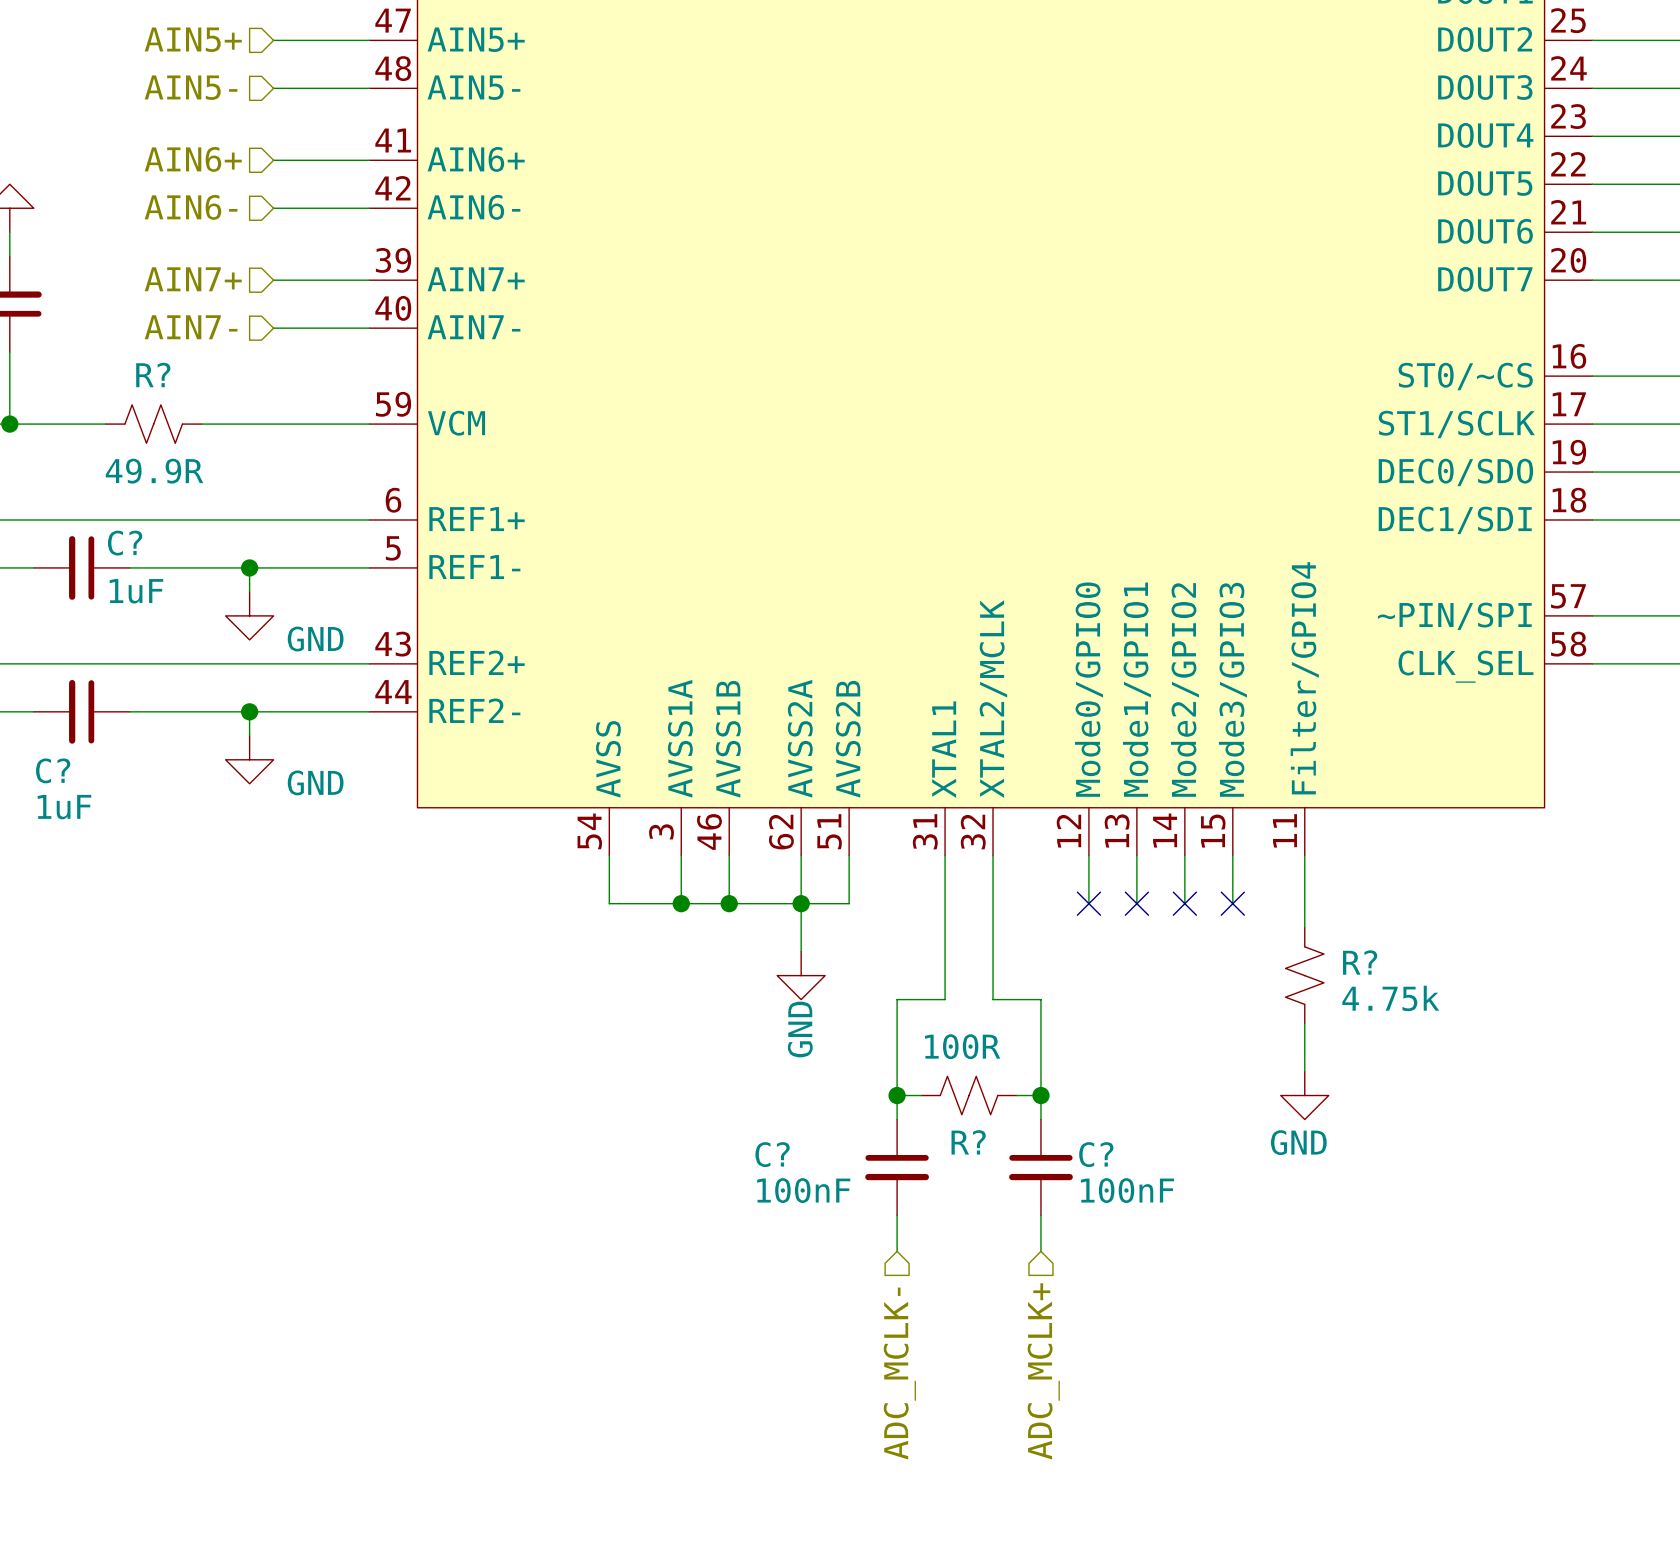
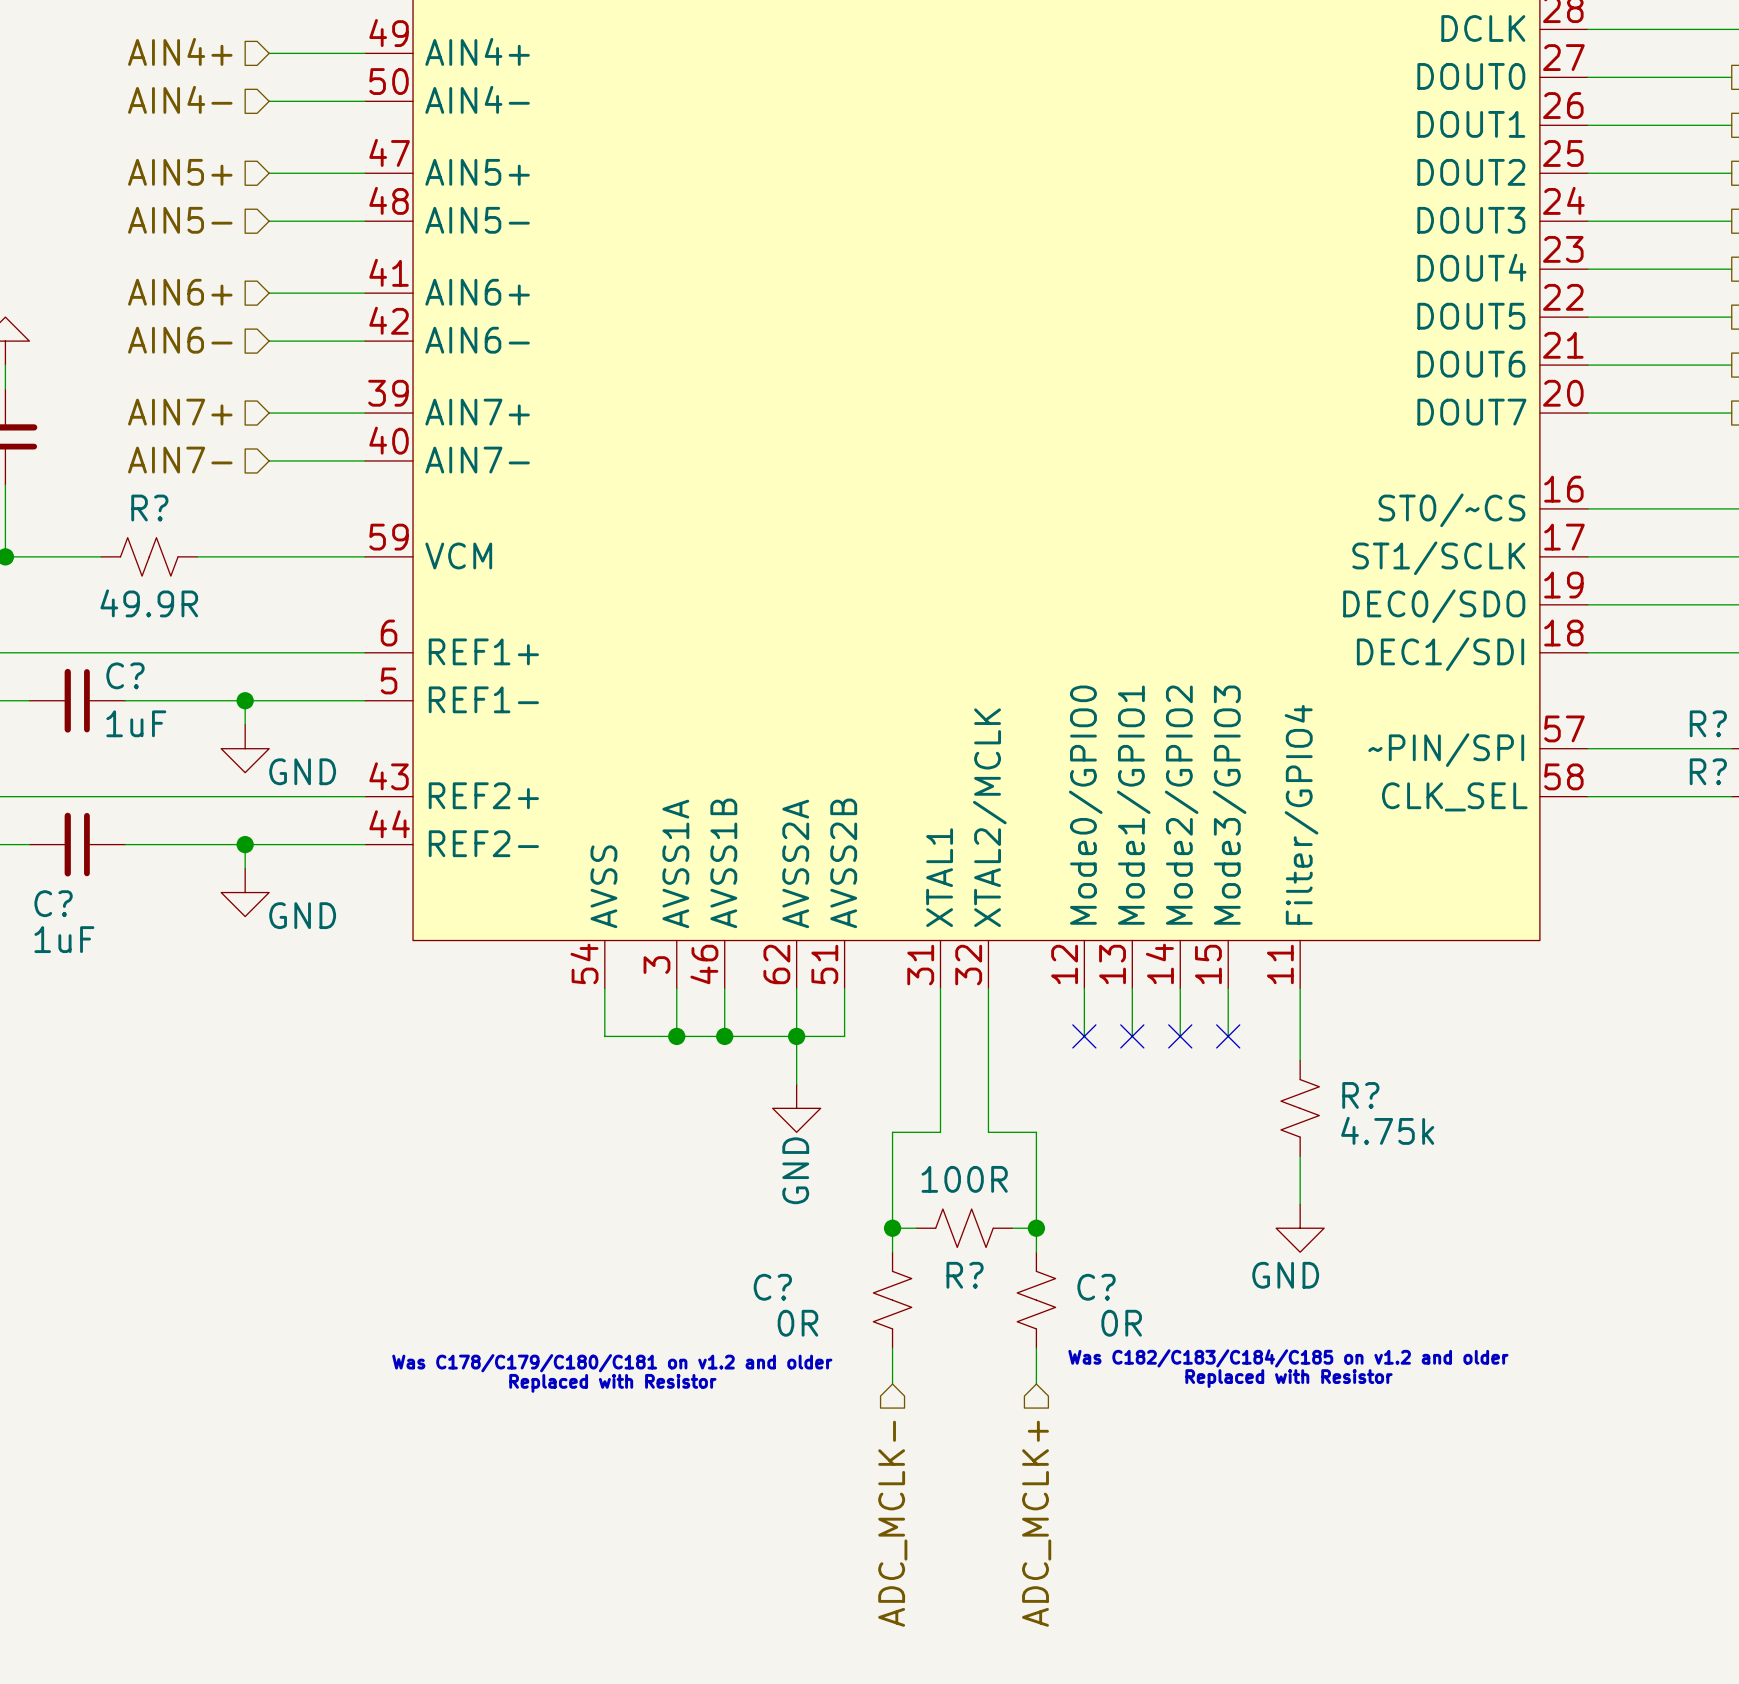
C? symbol: [865, 1119, 929, 1216] -> [873, 1252, 912, 1349]
C? symbol: [1009, 1119, 1073, 1216] -> [1017, 1252, 1056, 1349]
C? value: 100nF (803, 1190) -> 0R (797, 1323)
C? value: 100nF (1127, 1190) -> 0R (1121, 1323)
text: none -> Was C182/C183/C184/C185 on v1.2 and older (1288, 1358)
text: none -> Was C178/C179/C180/C181 on v1.2 and older (612, 1363)
text: none -> Replaced with Resistor (1289, 1378)
text: none -> Replaced with Resistor (612, 1383)

